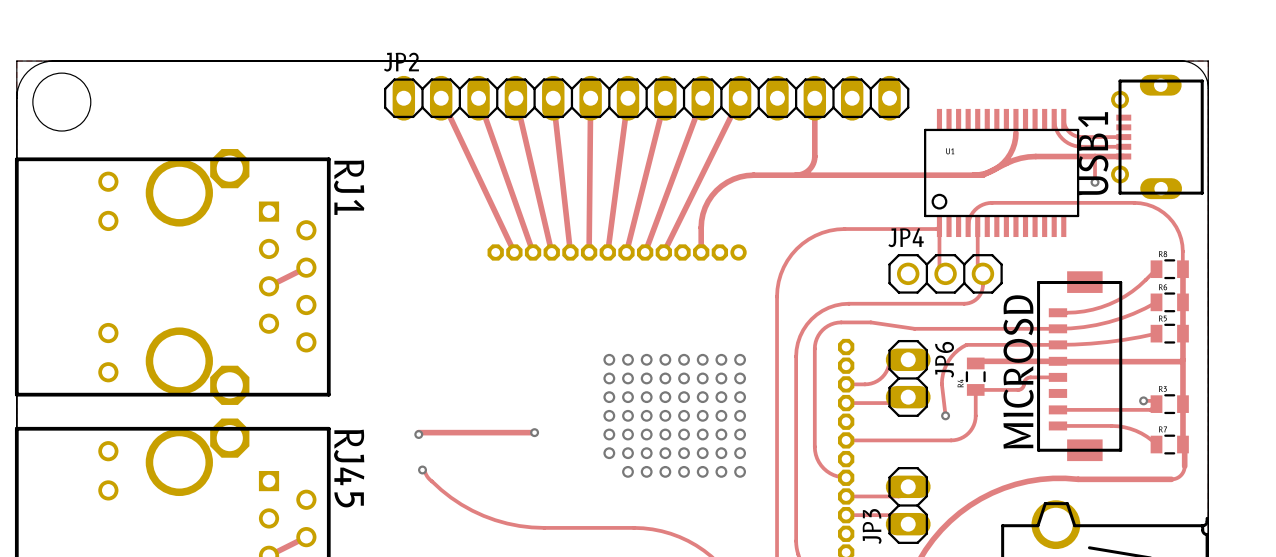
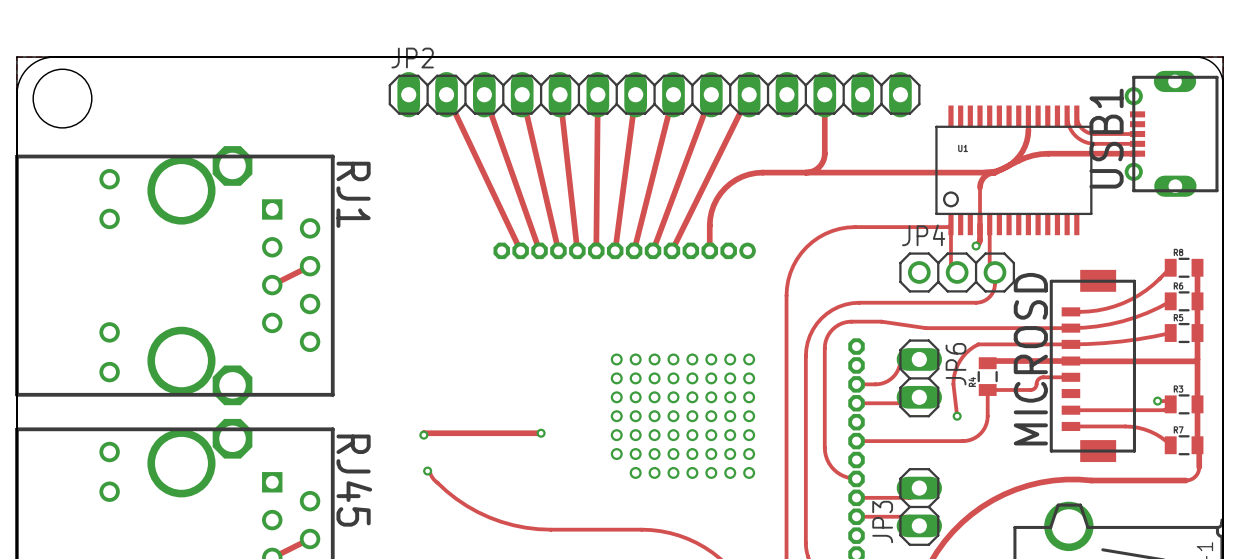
track: (1095, 156) (1095, 182) -> none
track: none -> (994, 172) (985, 175) (980, 183) (979, 240) (976, 246)
via: (1095, 182) -> none
track: (968, 226) (973, 212) (980, 206) (988, 203) (1140, 203) (1158, 209) (1168, 217) (1176, 227) (1182, 245) (1182, 269) -> none
via: none -> (976, 246)

